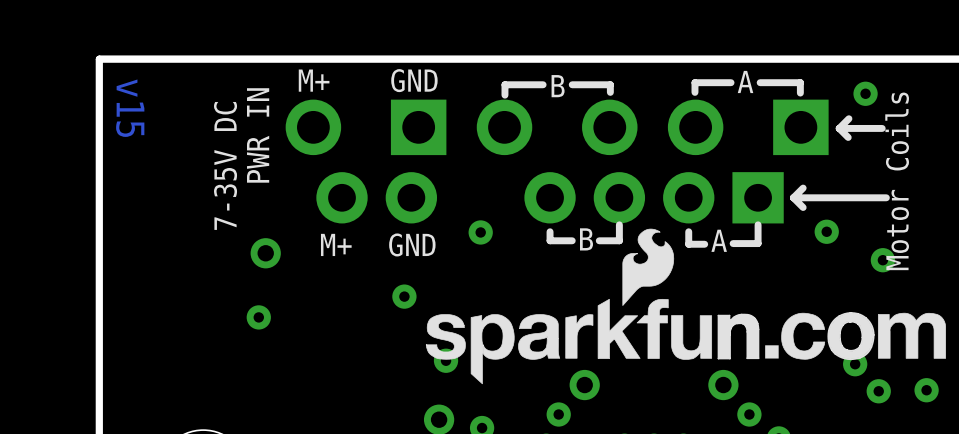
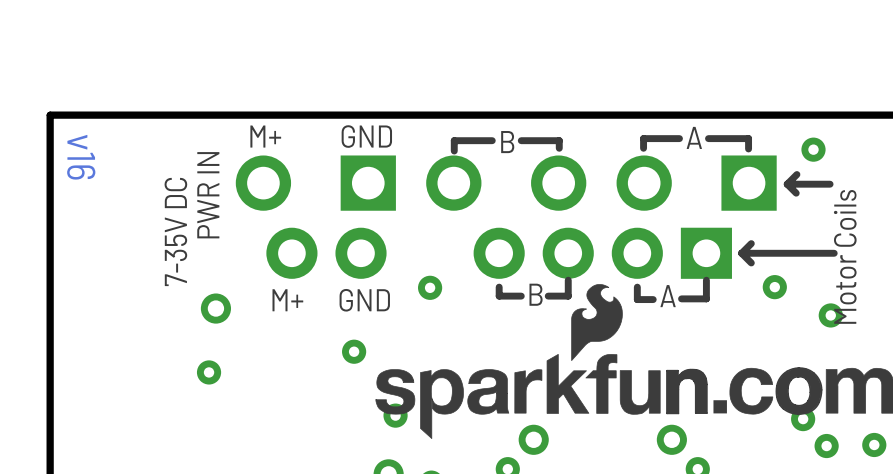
text: v15 (130, 108) -> v16 (81, 157)

